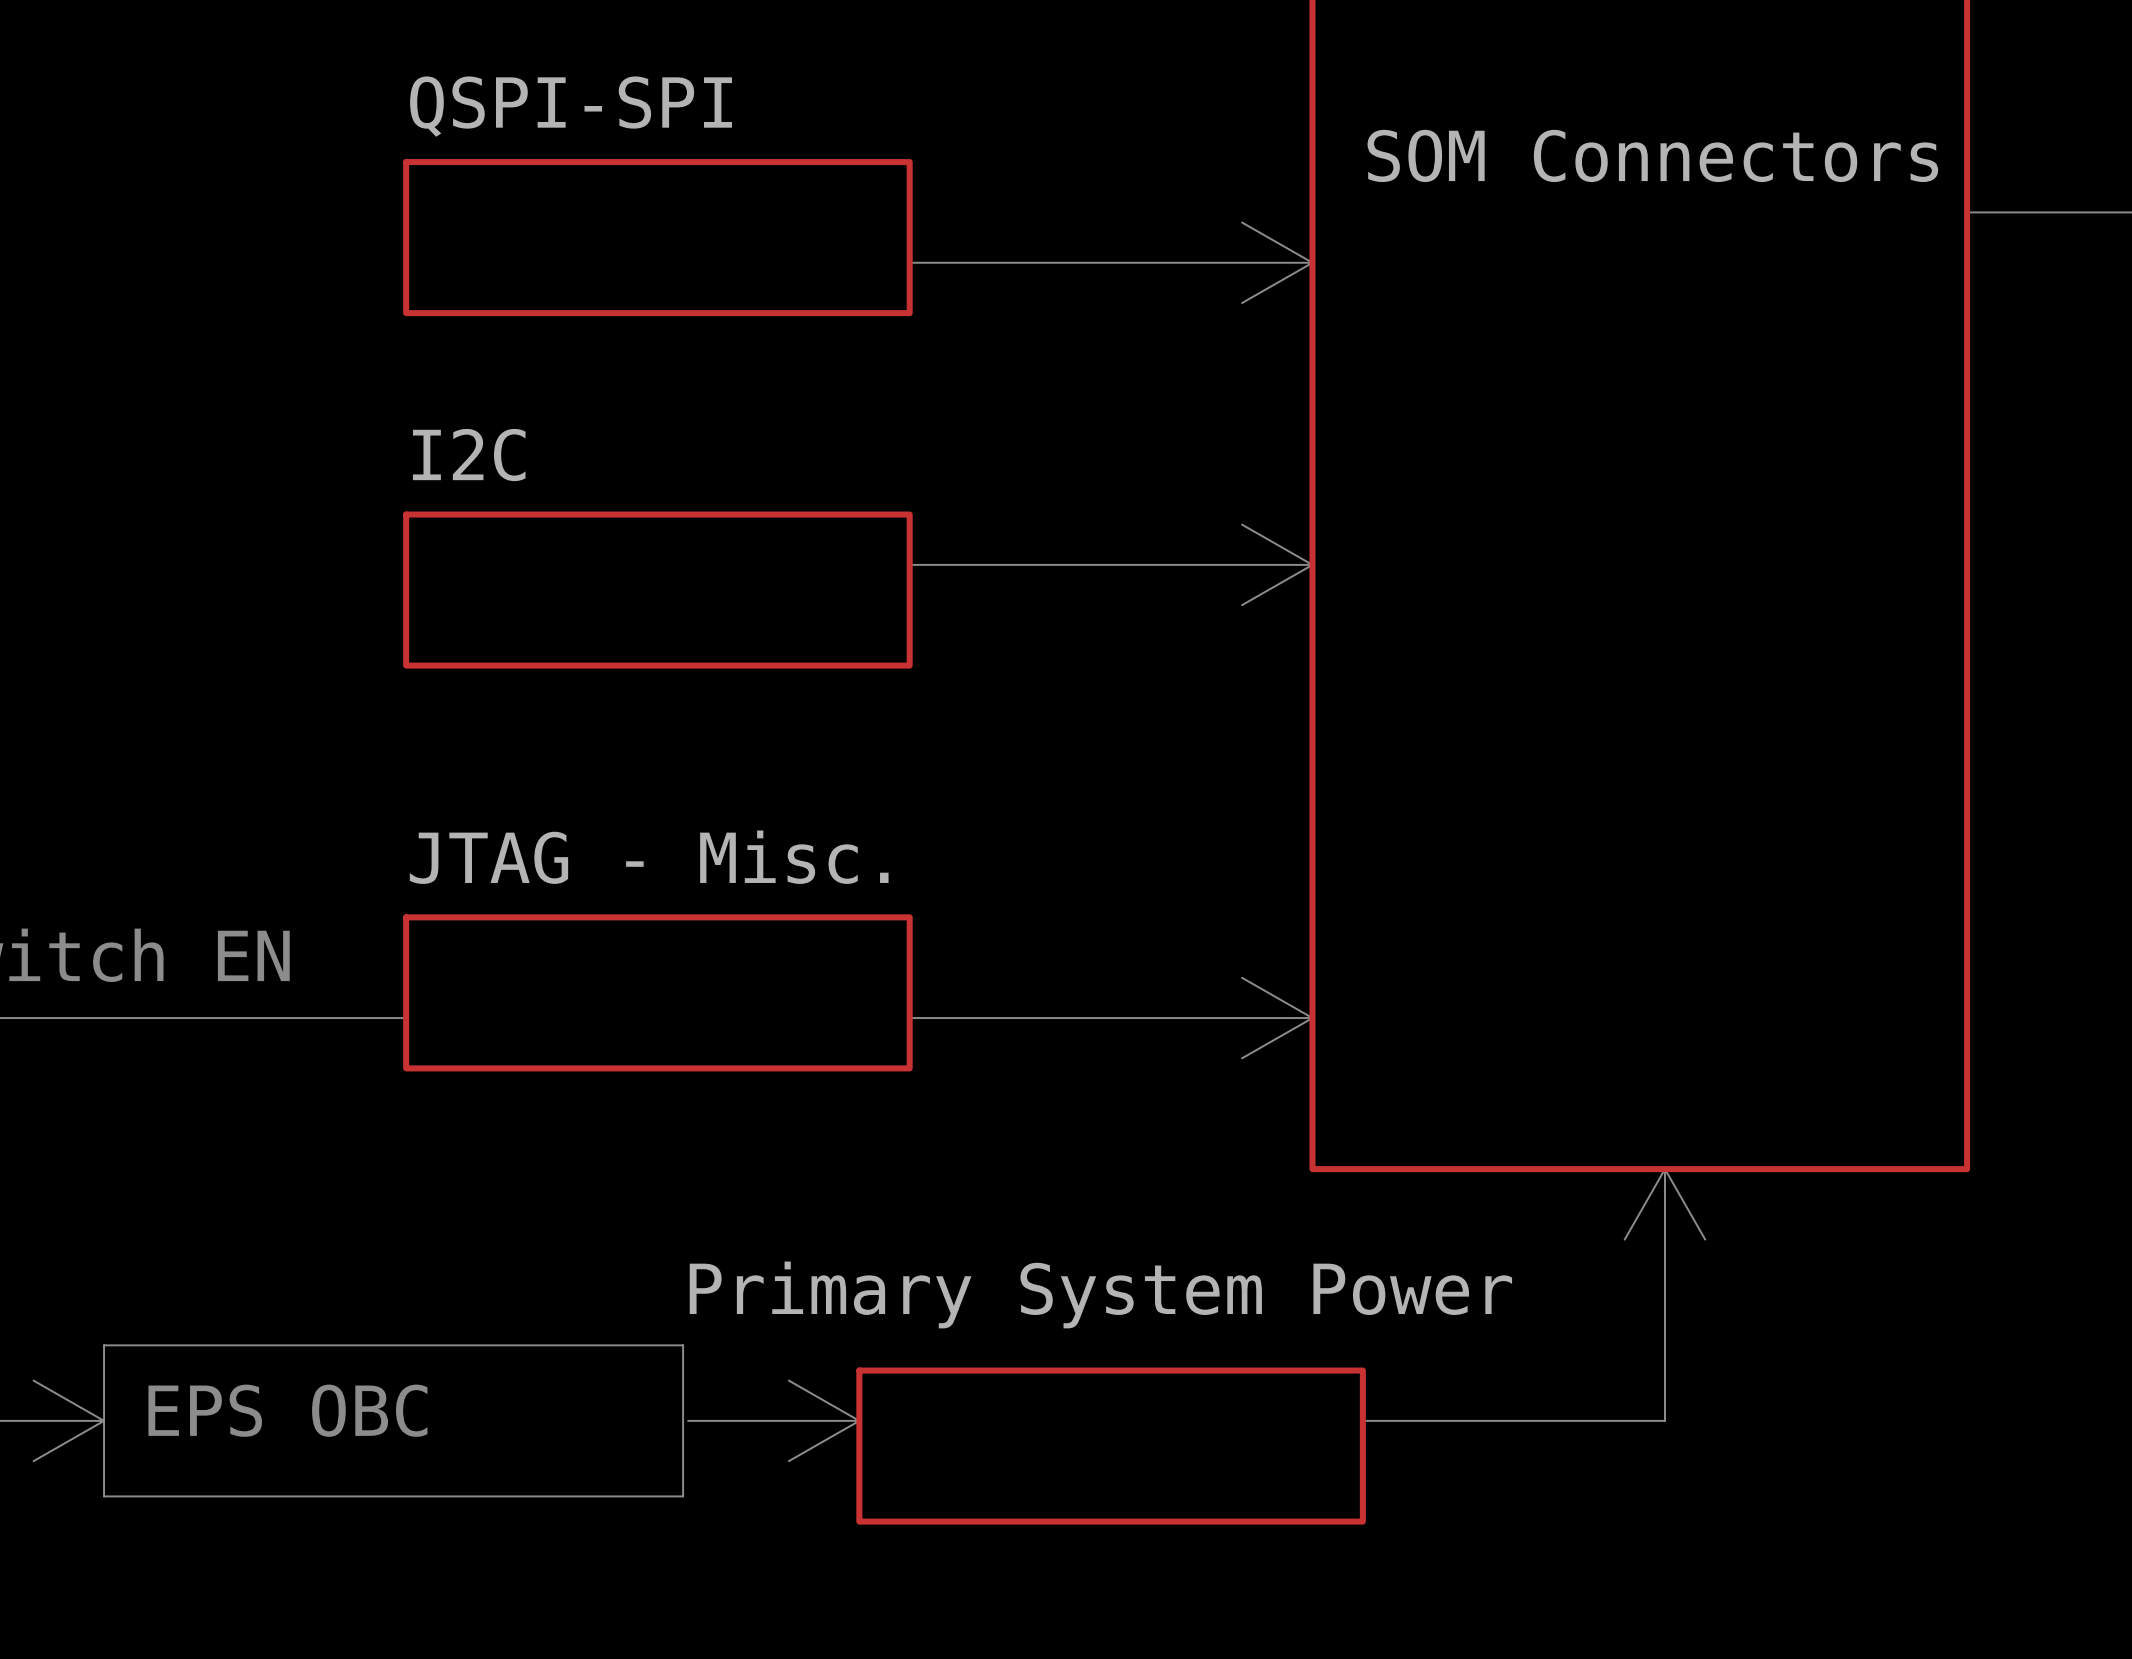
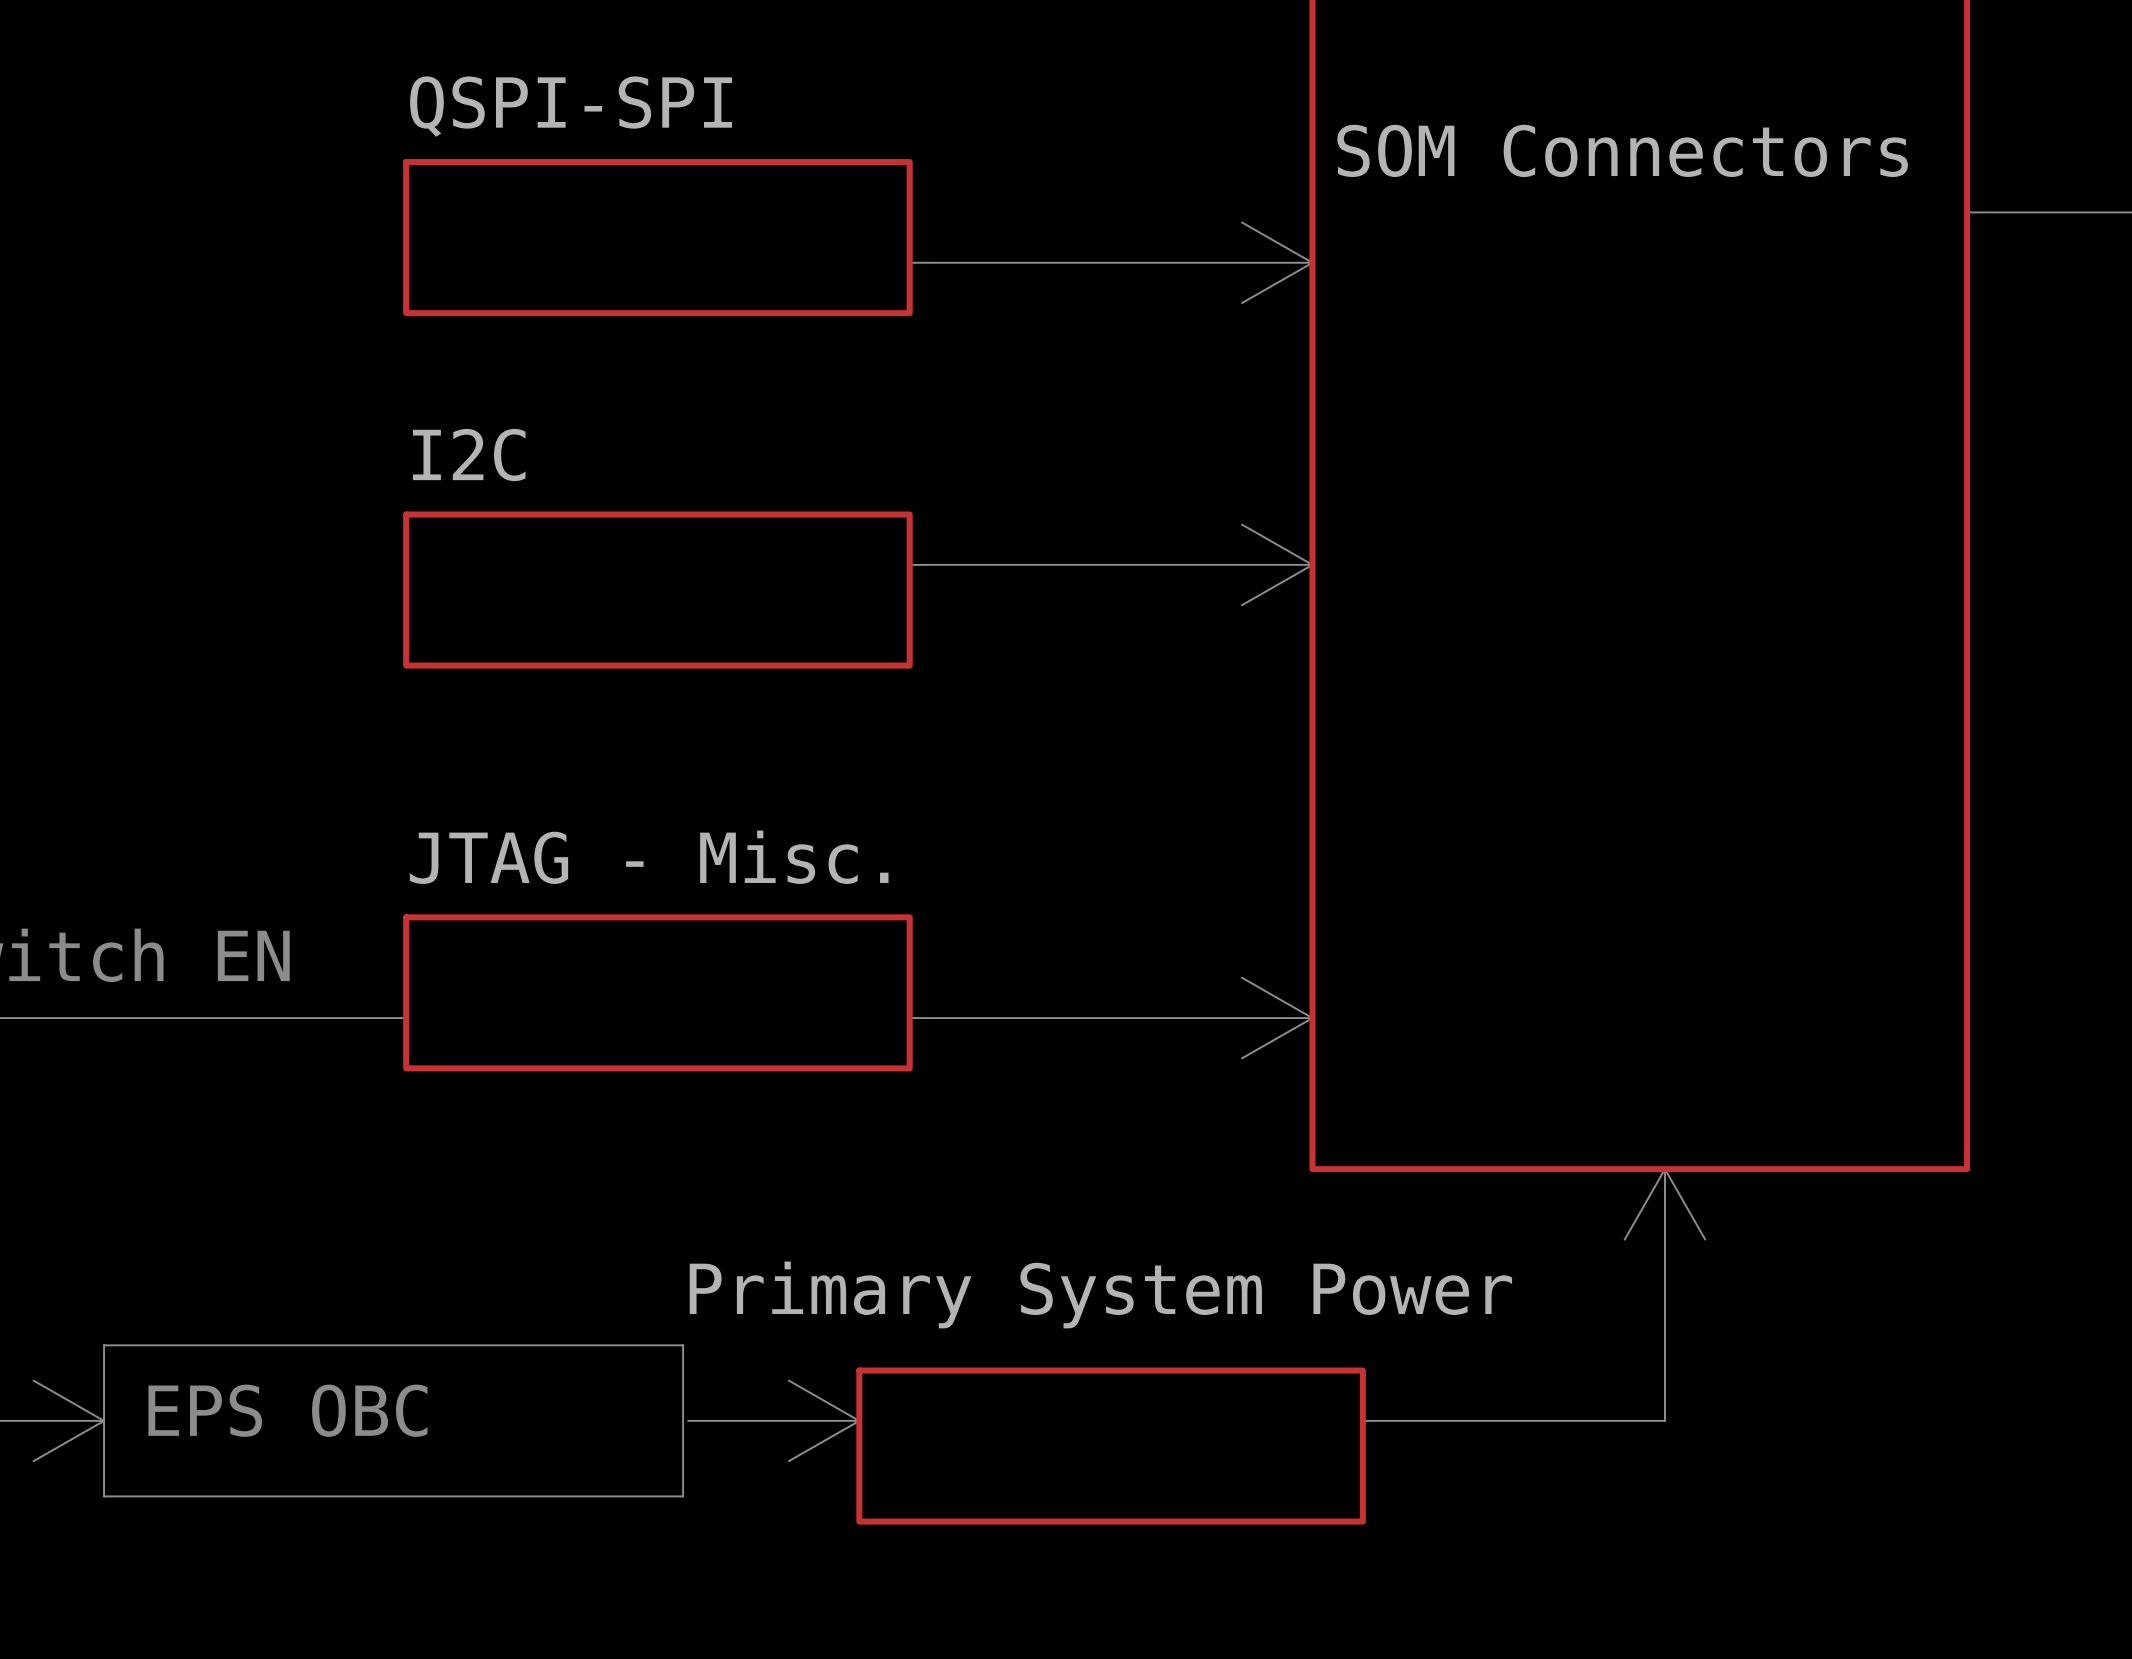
sheet SOM Connectors name position: SOM Connectors (1652, 155) -> SOM Connectors (1622, 150)

